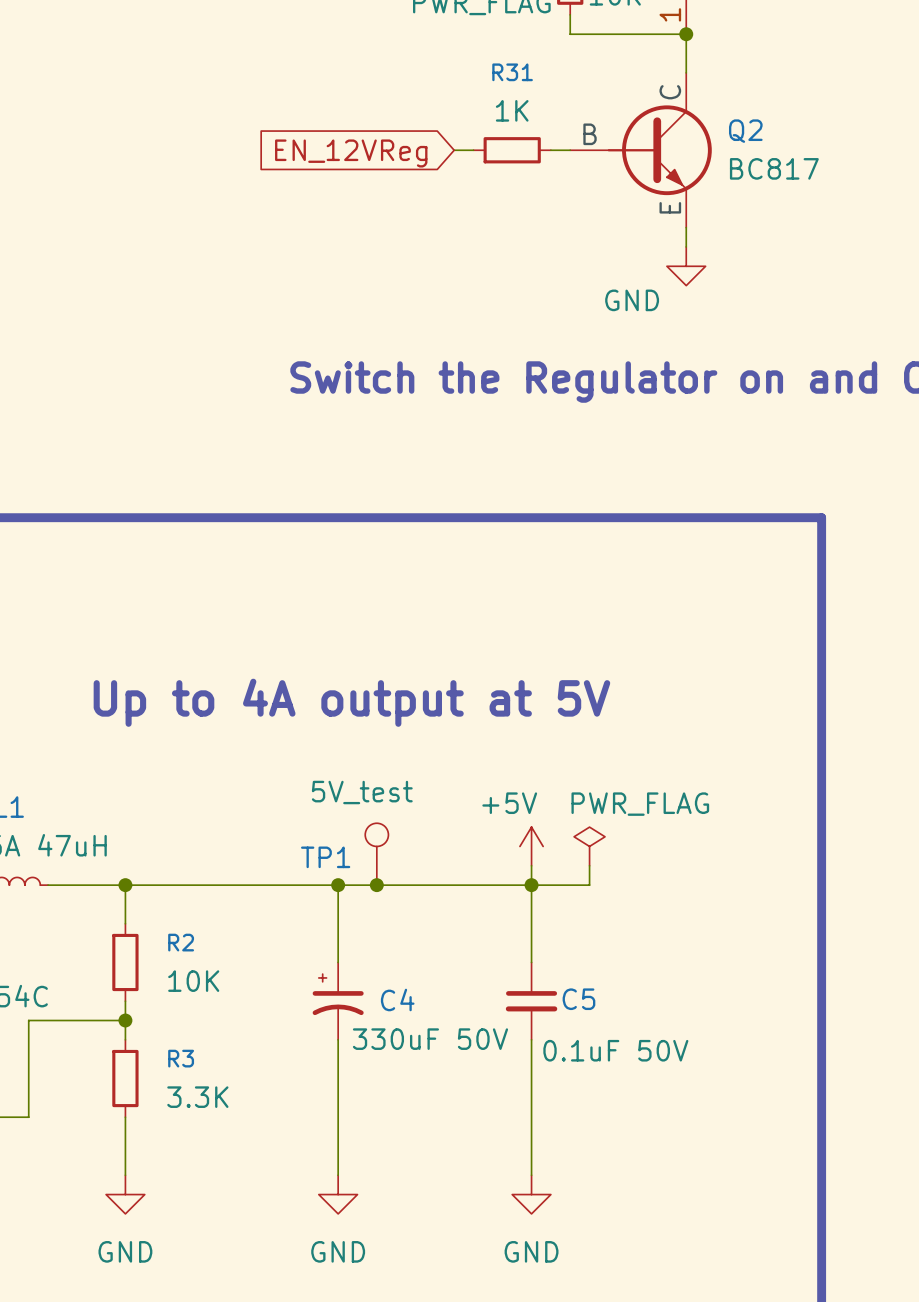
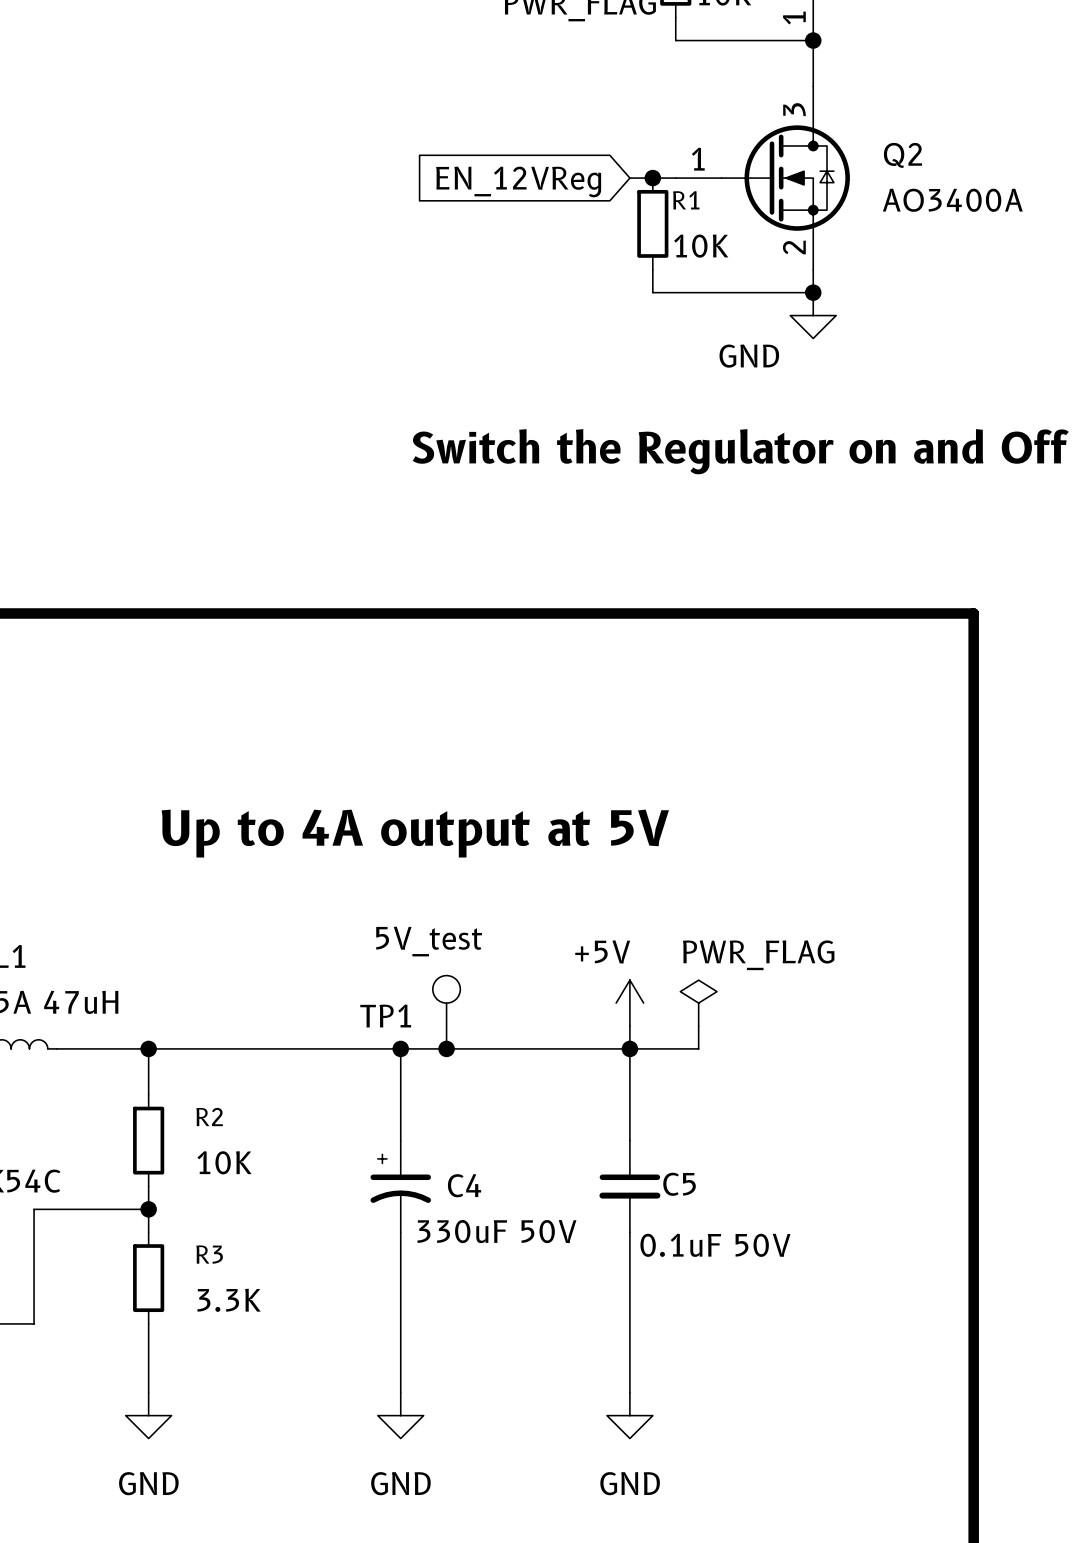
Q2 symbol: [570, 72, 712, 228] -> [675, 86, 850, 270]
R31: 1K (512, 150) -> none
junction: none -> (652, 178)
global label position: EN_12VReg (351, 153) -> EN_12VReg (518, 181)
Q2 value: BC817 (774, 168) -> AO3400A (952, 200)
R1: none -> 10K (652, 223)
wire: none -> (652, 269) (652, 292) (813, 292)
junction: none -> (813, 292)

